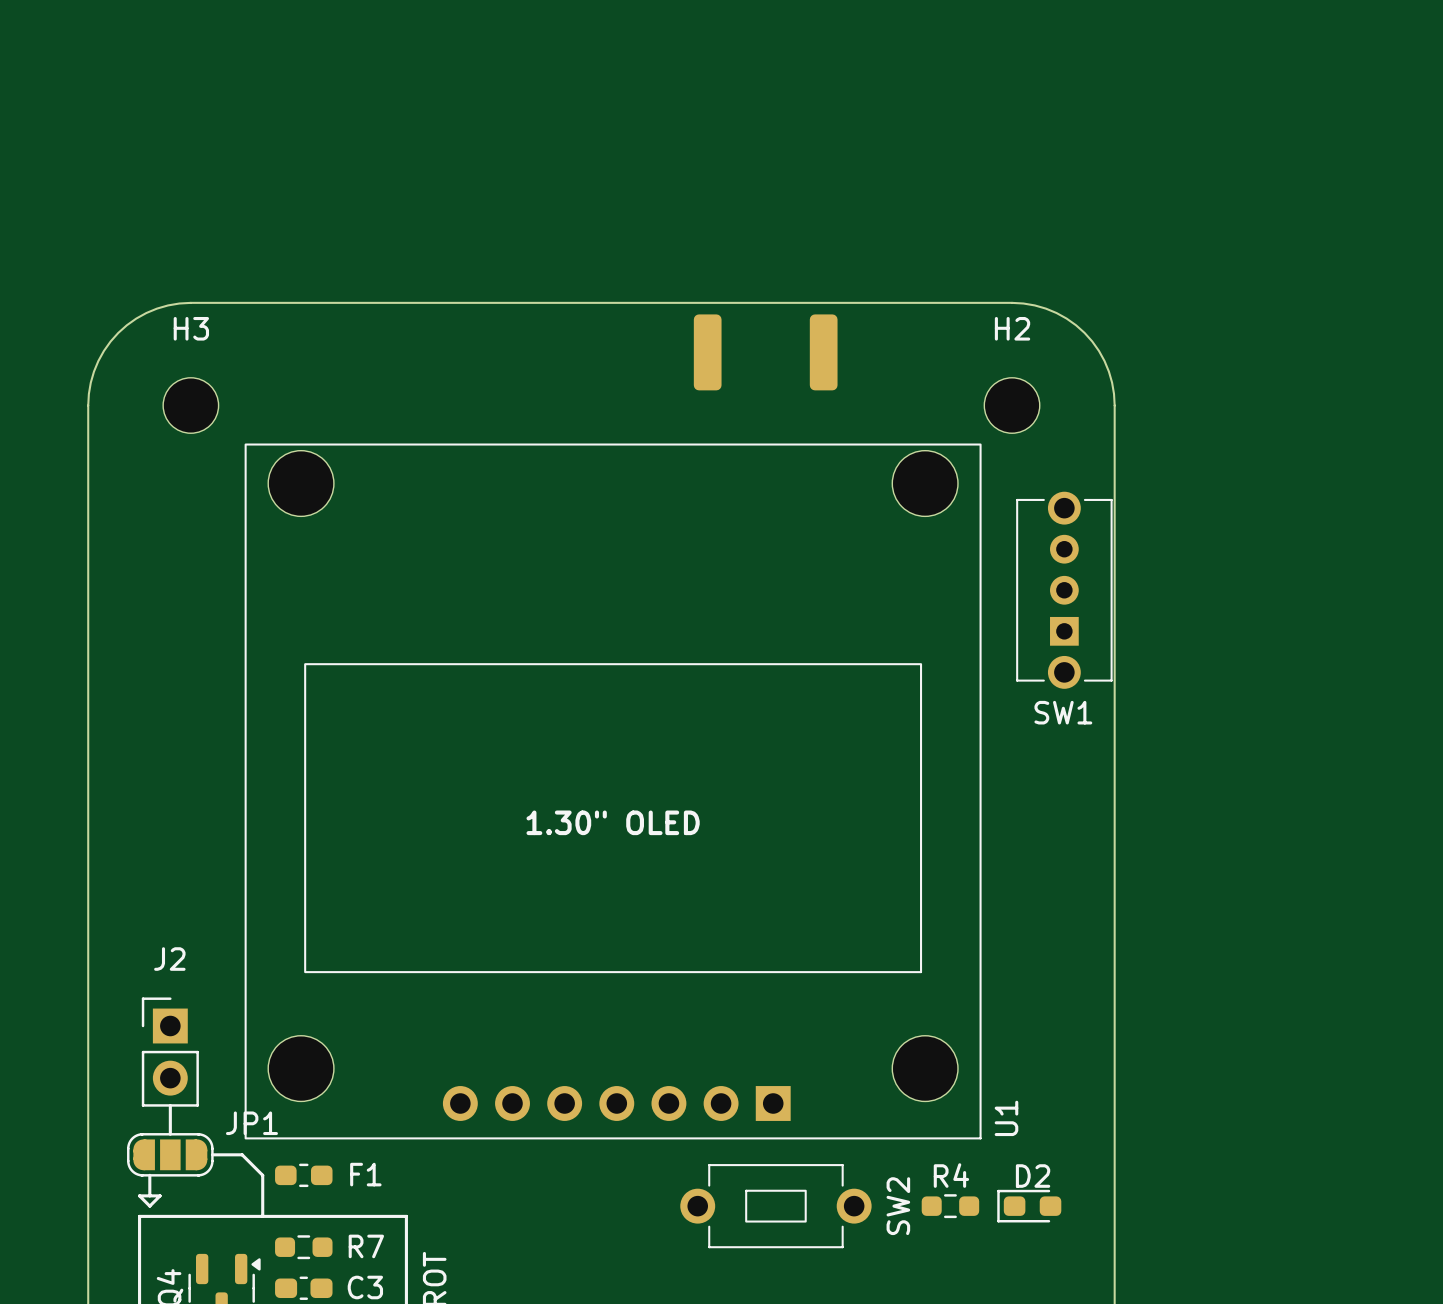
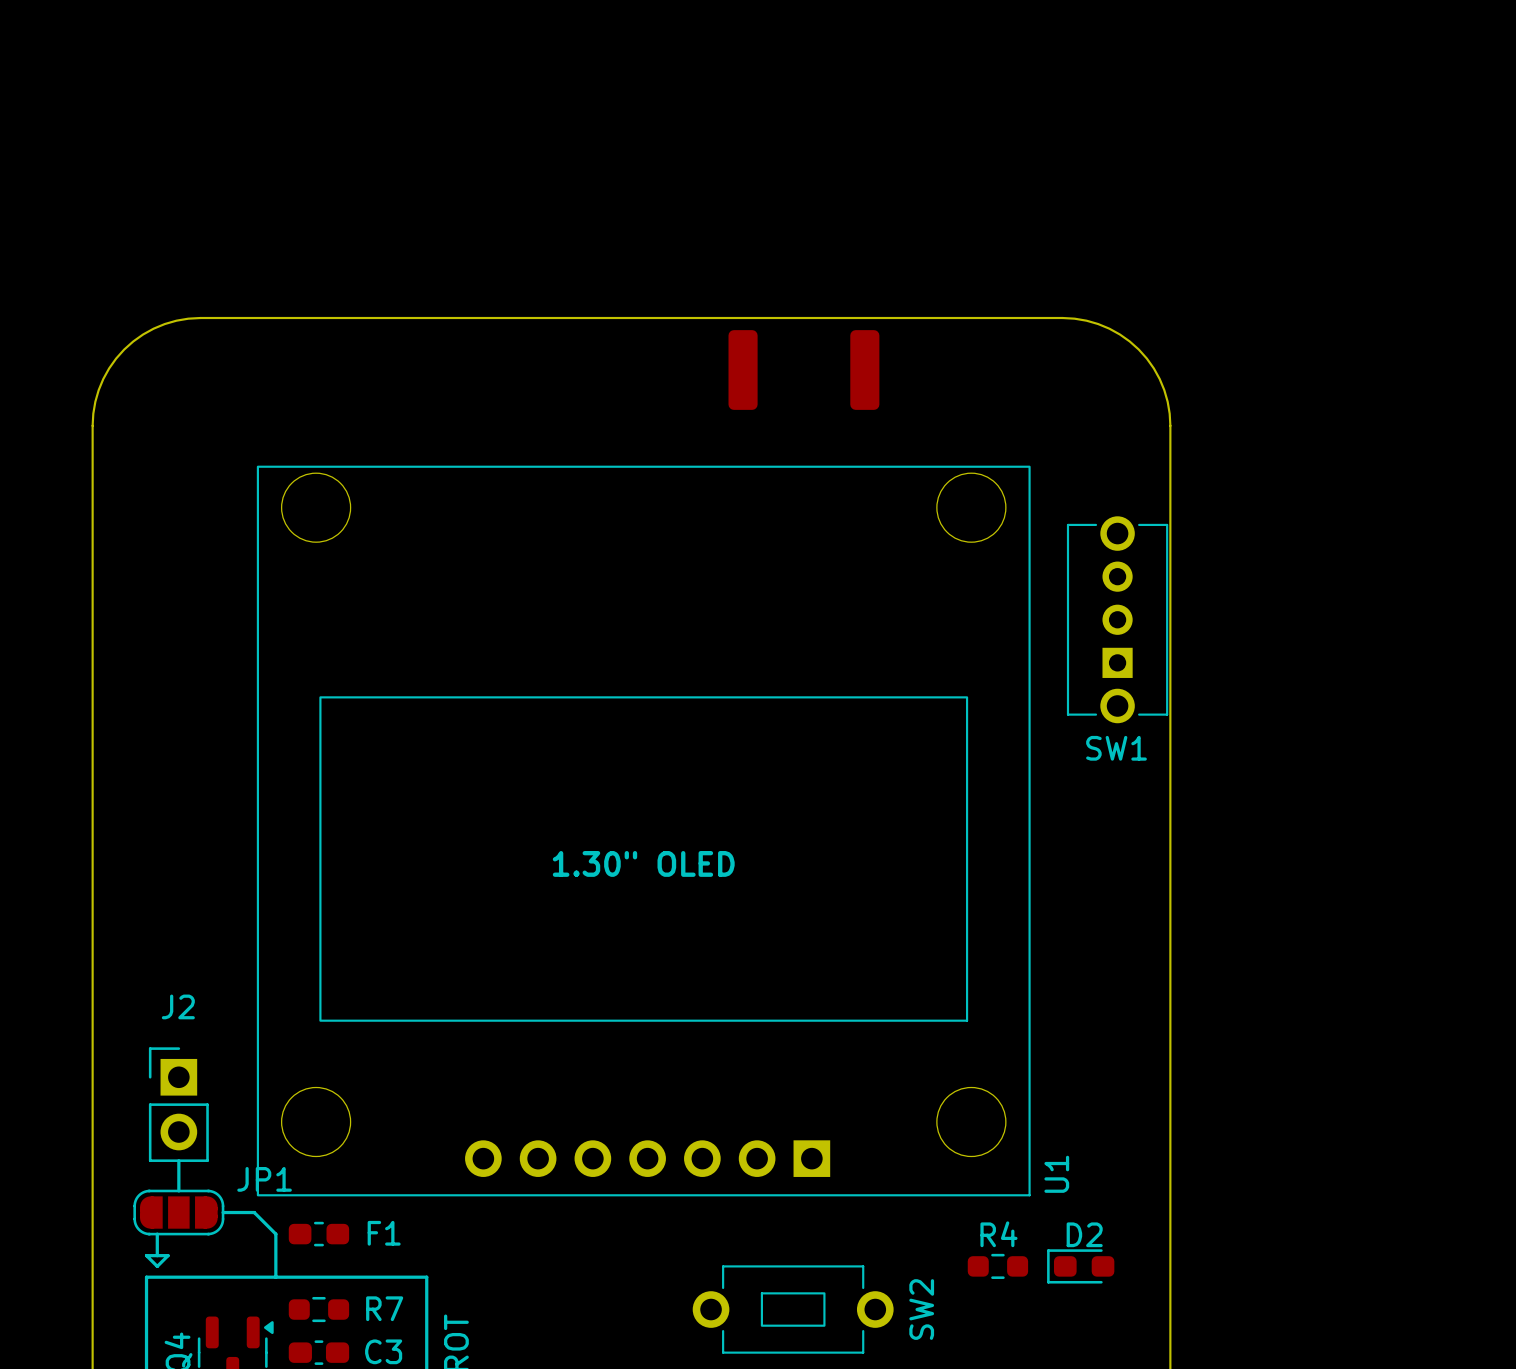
H3: (190, 405) -> none
H2: (1012, 405) -> none
SW2 position: (775, 1206) -> (793, 1309)

